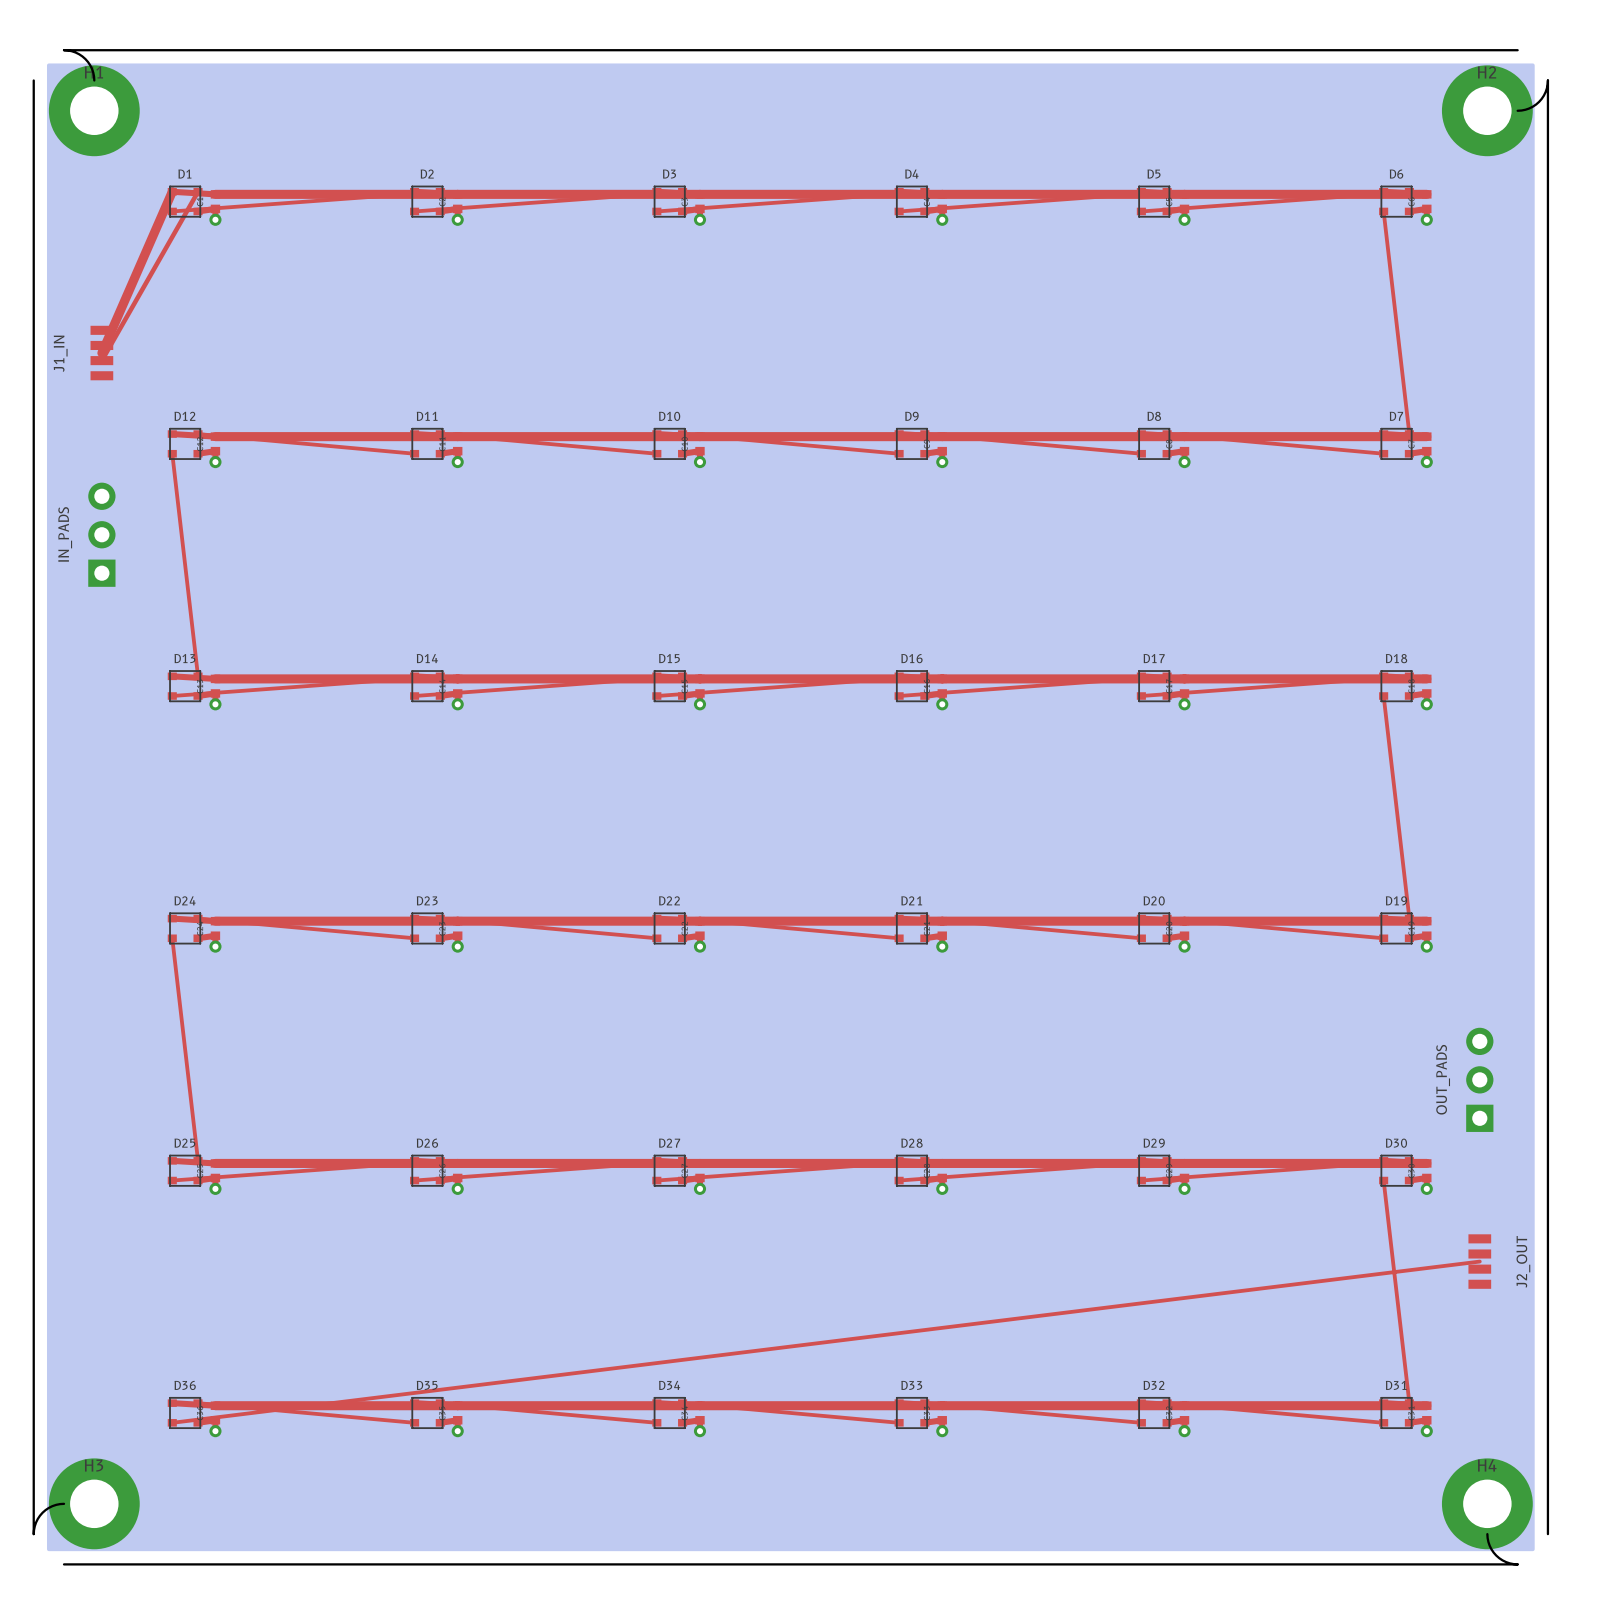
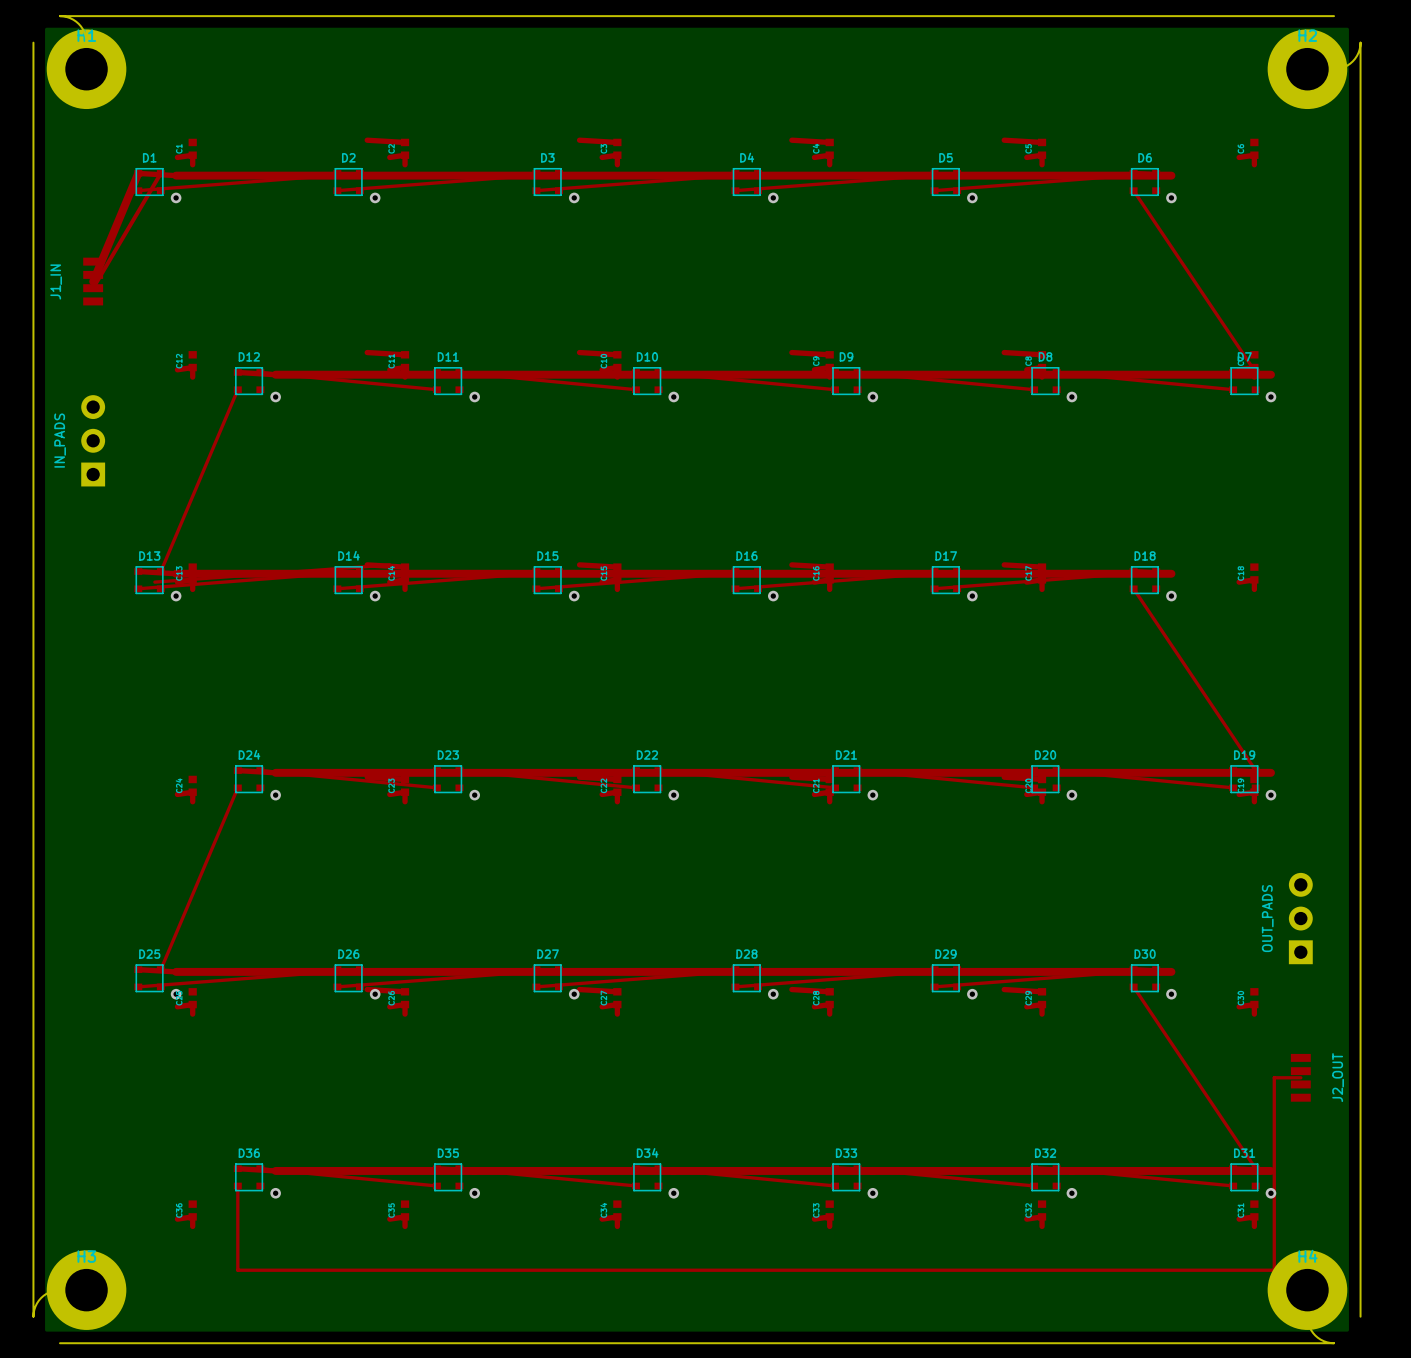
top track: (198, 191) (101, 360) -> (160, 173) (93, 288)
top track: (440, 191) (172, 211) -> none
top track: (682, 191) (414, 211) -> none
top track: (924, 191) (656, 211) -> none
top track: (1167, 191) (899, 211) -> none
top track: (1383, 191) (1426, 194) (215, 194) (172, 191) (101, 353) -> (1133, 173) (1171, 175) (176, 175) (138, 173) (93, 281)
top track: (1409, 191) (1141, 211) -> none
D1 position: (185, 201) -> (149, 182)
D2 position: (427, 201) -> (348, 182)
D3 position: (669, 201) -> (547, 182)
D4 position: (911, 201) -> (746, 182)
D5 position: (1154, 201) -> (945, 182)
D6 position: (1396, 201) -> (1144, 182)
top track: (1383, 211) (1409, 434) -> none
via position: (215, 219) -> (176, 197)
via position: (457, 219) -> (375, 197)
via position: (699, 219) -> (574, 197)
via position: (942, 219) -> (773, 197)
via: (1184, 219) -> none
via: (1426, 219) -> none
top track: none -> (359, 173) (138, 190)
top track: none -> (558, 173) (337, 190)
top track: none -> (758, 173) (536, 190)
top track: none -> (957, 173) (735, 190)
top track: none -> (1156, 173) (934, 190)
top track: none -> (1133, 190) (1255, 372)
via: none -> (972, 197)
via: none -> (1171, 197)
top track: (172, 434) (215, 436) (1426, 436) (1383, 434) -> none
top track: (198, 434) (414, 453) -> none
top track: (440, 434) (656, 453) -> none
top track: (682, 434) (899, 453) -> none
top track: (924, 434) (1141, 453) -> none
top track: (1167, 434) (1383, 453) -> none
D12 position: (185, 443) -> (249, 381)
D11 position: (427, 443) -> (448, 381)
D10 position: (669, 443) -> (647, 381)
D9 position: (911, 443) -> (846, 381)
D8 position: (1154, 443) -> (1045, 381)
D7 position: (1396, 443) -> (1244, 381)
top track: (172, 453) (198, 676) -> none
top track: none -> (237, 372) (275, 374) (1270, 374) (1233, 372)
top track: none -> (260, 372) (436, 389)
top track: none -> (459, 372) (635, 389)
top track: none -> (658, 372) (835, 389)
top track: none -> (857, 372) (1034, 389)
top track: none -> (1056, 372) (1233, 389)
via: (215, 462) -> none
via: (457, 462) -> none
via position: (699, 462) -> (673, 397)
via position: (942, 462) -> (872, 397)
via position: (1184, 462) -> (1071, 397)
via position: (1426, 462) -> (1270, 397)
top track: none -> (237, 389) (160, 571)
via: none -> (275, 397)
via: none -> (474, 397)
top track: (172, 676) (215, 678) (1426, 678) (1383, 676) -> none
top track: (682, 676) (414, 696) -> none
top track: (924, 676) (656, 696) -> none
top track: (1167, 676) (899, 696) -> none
top track: (1409, 676) (1141, 696) -> none
top track: none -> (138, 571) (176, 573) (1171, 573) (1133, 571)
top track: none -> (359, 571) (138, 588)
top track: none -> (558, 571) (337, 588)
top track: none -> (758, 571) (536, 588)
top track: none -> (957, 571) (735, 588)
top track: none -> (1156, 571) (934, 588)
D13 position: (185, 686) -> (149, 580)
D14 position: (427, 686) -> (348, 580)
D15 position: (669, 686) -> (547, 580)
D16 position: (911, 686) -> (746, 580)
D17 position: (1154, 686) -> (945, 580)
D18 position: (1396, 686) -> (1144, 580)
top track: (1383, 696) (1409, 918) -> none
top track: none -> (1133, 588) (1255, 770)
via position: (215, 704) -> (176, 596)
via position: (457, 704) -> (375, 596)
via position: (699, 704) -> (574, 596)
via position: (942, 704) -> (773, 596)
via: (1184, 704) -> none
via: (1426, 704) -> none
via: none -> (972, 596)
via: none -> (1171, 596)
top track: none -> (237, 770) (275, 772) (1270, 772) (1233, 770)
top track: none -> (260, 770) (436, 787)
top track: none -> (459, 770) (635, 787)
top track: none -> (658, 770) (835, 787)
top track: none -> (857, 770) (1034, 787)
top track: none -> (1056, 770) (1233, 787)
top track: (172, 918) (215, 921) (1426, 921) (1383, 918) -> none
top track: (198, 918) (414, 938) -> none
top track: (440, 918) (656, 938) -> none
top track: (682, 918) (899, 938) -> none
top track: (924, 918) (1141, 938) -> none
top track: (1167, 918) (1383, 938) -> none
D24 position: (185, 928) -> (249, 779)
D23 position: (427, 928) -> (448, 779)
D22 position: (669, 928) -> (647, 779)
D21 position: (911, 928) -> (846, 779)
D20 position: (1154, 928) -> (1045, 779)
D19 position: (1396, 928) -> (1244, 779)
top track: none -> (237, 787) (160, 969)
top track: (172, 938) (198, 1160) -> none
via: none -> (275, 795)
via: none -> (474, 795)
via: (215, 946) -> none
via: (457, 946) -> none
via position: (699, 946) -> (673, 795)
via position: (942, 946) -> (872, 795)
via position: (1184, 946) -> (1071, 795)
via position: (1426, 946) -> (1270, 795)
top track: none -> (138, 969) (176, 971) (1171, 971) (1133, 969)
top track: none -> (359, 969) (138, 986)
top track: none -> (558, 969) (337, 986)
top track: none -> (758, 969) (536, 986)
top track: none -> (957, 969) (735, 986)
top track: none -> (1156, 969) (934, 986)
top track: none -> (1133, 986) (1255, 1168)
top track: (172, 1160) (215, 1163) (1426, 1163) (1383, 1160) -> none
top track: (440, 1160) (172, 1180) -> none
top track: (682, 1160) (414, 1180) -> none
top track: (924, 1160) (656, 1180) -> none
top track: (1167, 1160) (899, 1180) -> none
top track: (1409, 1160) (1141, 1180) -> none
via: none -> (972, 994)
via: none -> (1171, 994)
D25 position: (185, 1170) -> (149, 978)
D26 position: (427, 1170) -> (348, 978)
D27 position: (669, 1170) -> (547, 978)
D28 position: (911, 1170) -> (746, 978)
D29 position: (1154, 1170) -> (945, 978)
D30 position: (1396, 1170) -> (1144, 978)
top track: (1383, 1180) (1409, 1403) -> none
via position: (215, 1188) -> (176, 994)
via position: (457, 1188) -> (375, 994)
via position: (699, 1188) -> (574, 994)
via position: (942, 1188) -> (773, 994)
via: (1184, 1188) -> none
via: (1426, 1188) -> none
top track: (1479, 1261) (172, 1422) -> (1300, 1077) (1274, 1077) (1274, 1270) (237, 1270) (237, 1185)
top track: none -> (237, 1168) (275, 1170) (1270, 1170) (1233, 1168)
top track: none -> (260, 1168) (436, 1185)
top track: none -> (459, 1168) (635, 1185)
top track: none -> (658, 1168) (835, 1185)
top track: none -> (857, 1168) (1034, 1185)
top track: none -> (1056, 1168) (1233, 1185)
via: none -> (275, 1193)
via: none -> (474, 1193)
top track: (172, 1403) (215, 1405) (1426, 1405) (1383, 1403) -> none
top track: (198, 1403) (414, 1422) -> none
top track: (440, 1403) (656, 1422) -> none
top track: (682, 1403) (899, 1422) -> none
top track: (924, 1403) (1141, 1422) -> none
top track: (1167, 1403) (1383, 1422) -> none
D36 position: (185, 1412) -> (249, 1177)
D35 position: (427, 1412) -> (448, 1177)
D34 position: (669, 1412) -> (647, 1177)
D33 position: (911, 1412) -> (846, 1177)
D32 position: (1154, 1412) -> (1045, 1177)
D31 position: (1396, 1412) -> (1244, 1177)
via: (215, 1431) -> none
via: (457, 1431) -> none
via position: (699, 1431) -> (673, 1193)
via position: (942, 1431) -> (872, 1193)
via position: (1184, 1431) -> (1071, 1193)
via position: (1426, 1431) -> (1270, 1193)

